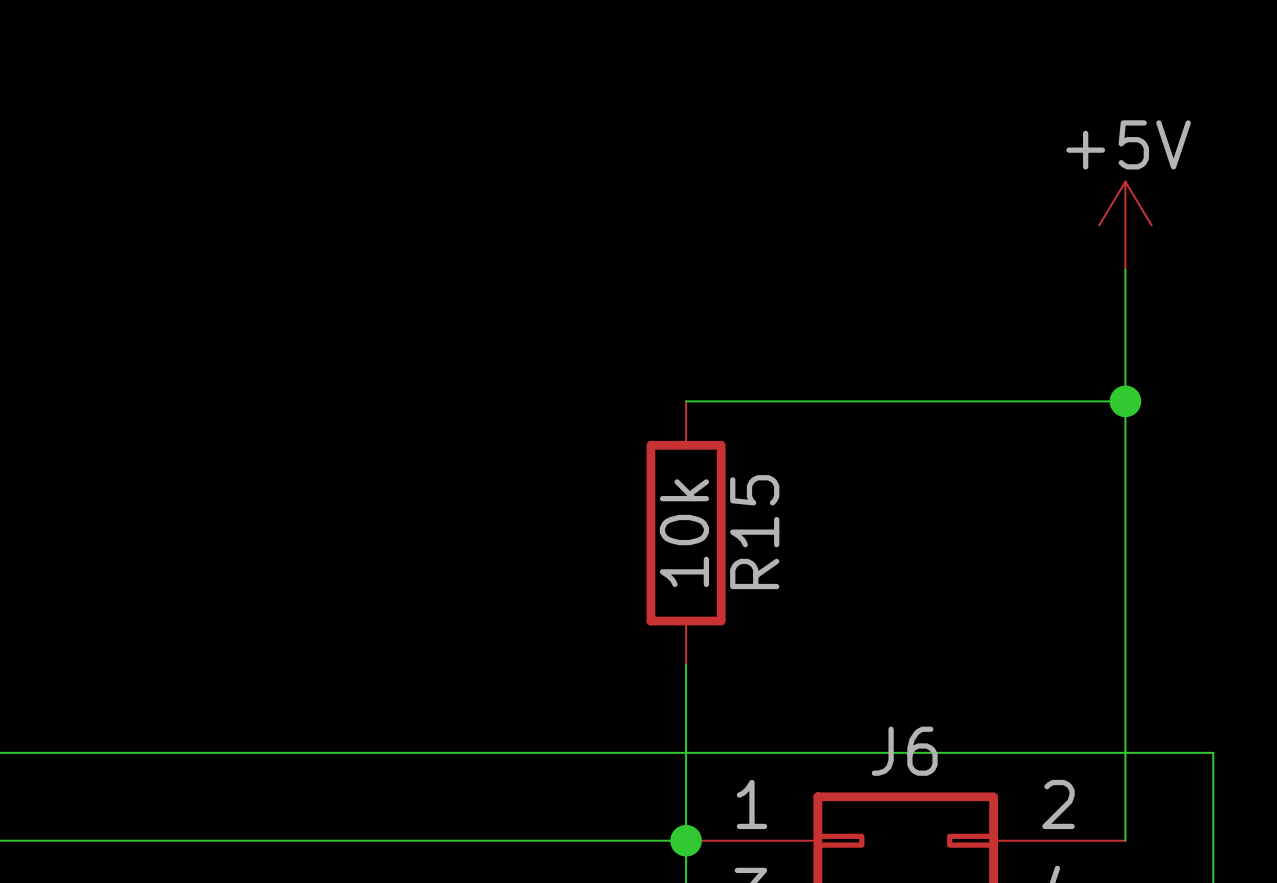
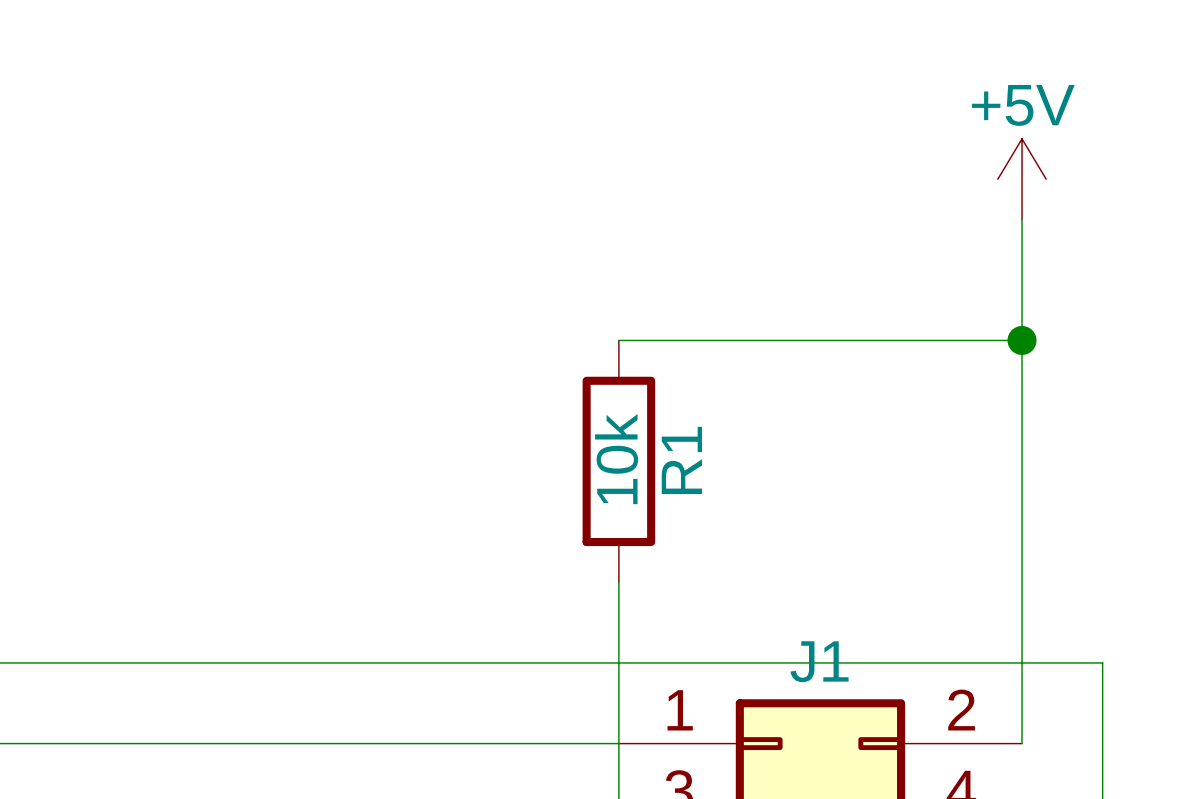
R15 name: R15 (754, 532) -> R1 (681, 460)
J6 name: J6 (904, 751) -> J1 (819, 661)
junction: (686, 840) -> none

